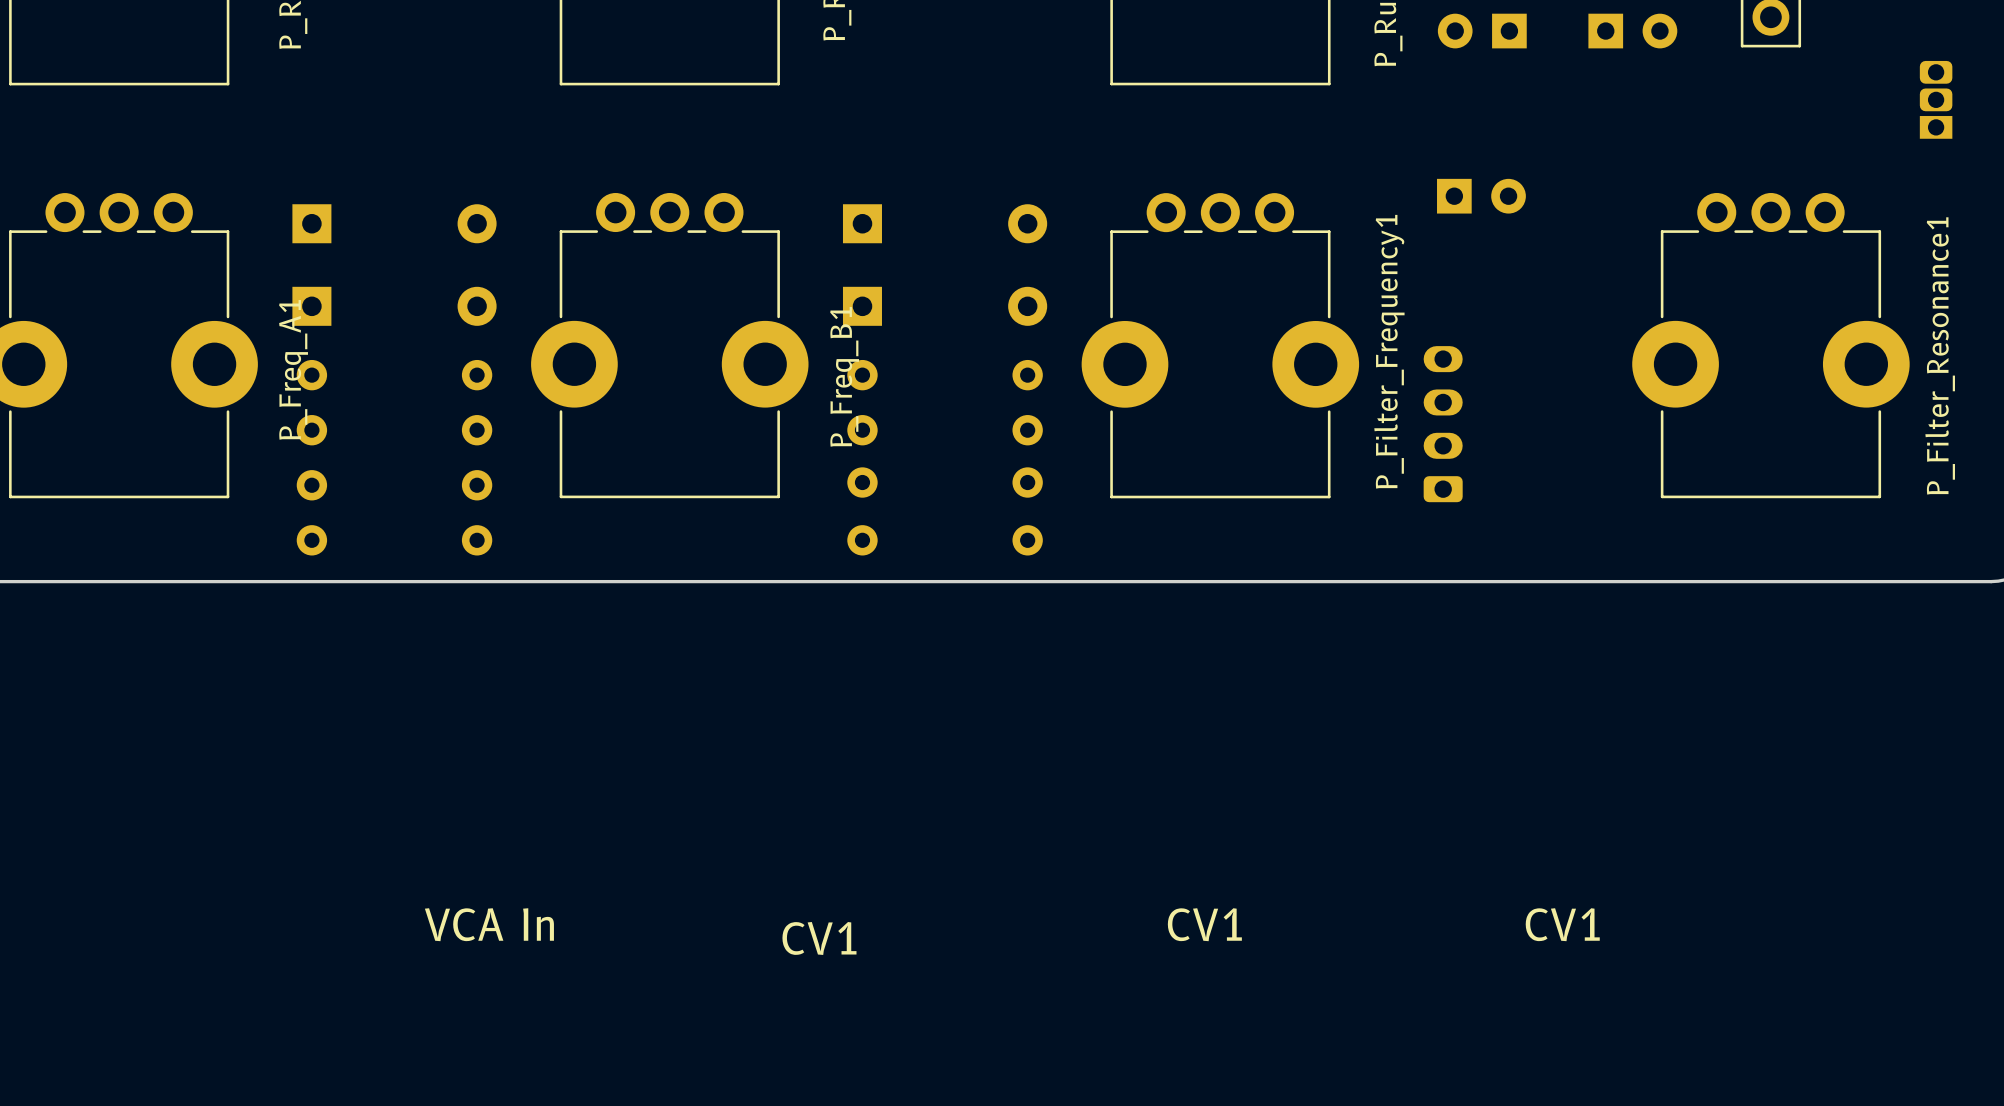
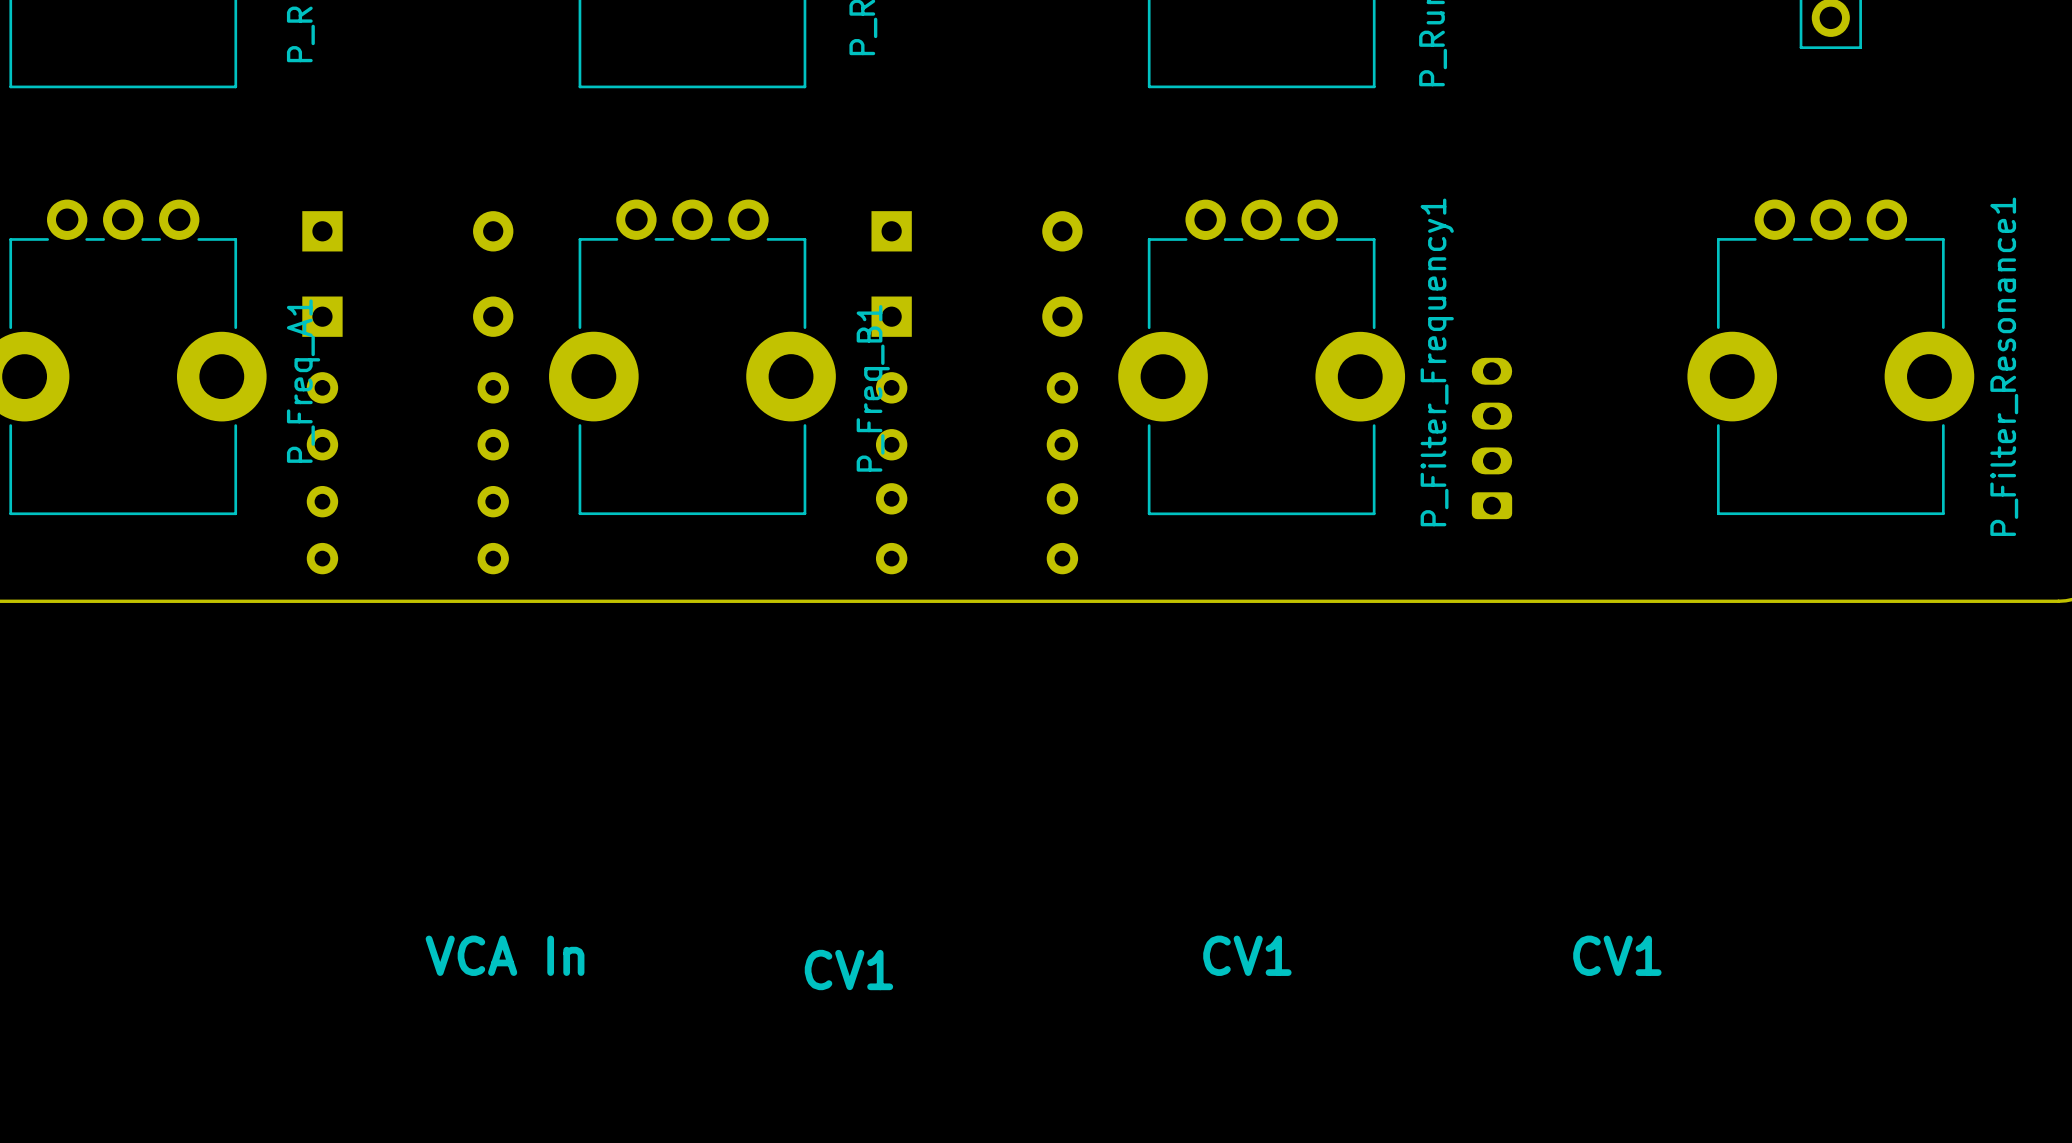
part: (1482, 31) -> none
part: (1632, 31) -> none
part: (1936, 99) -> none
part: (1481, 196) -> none

